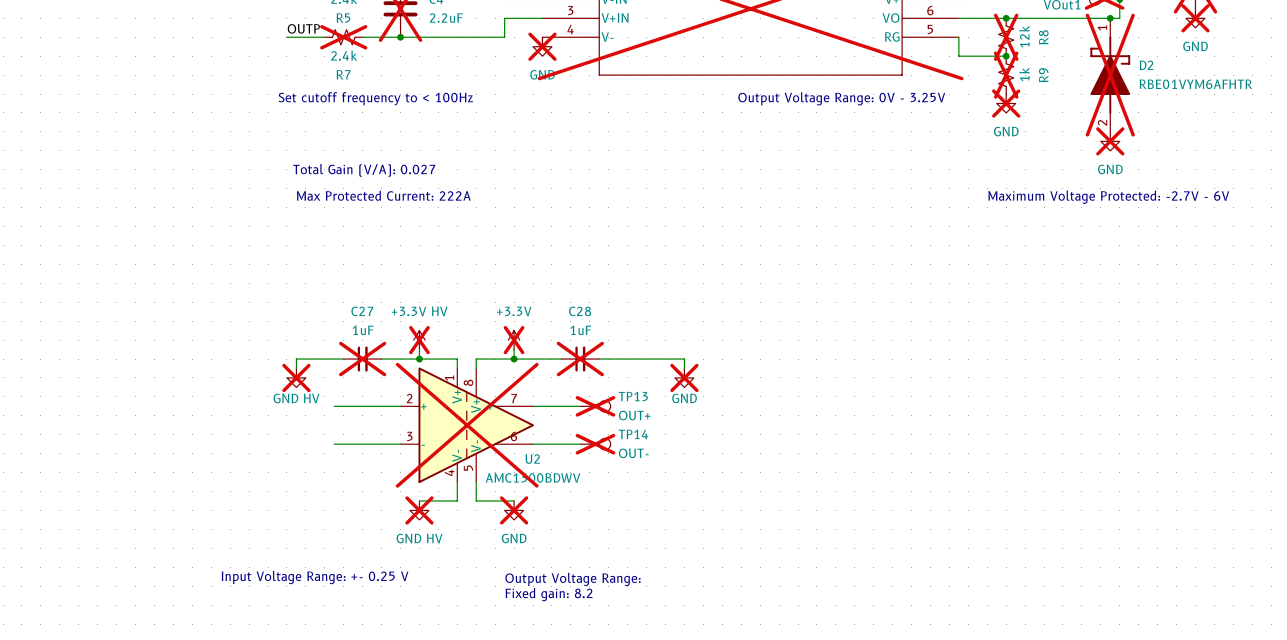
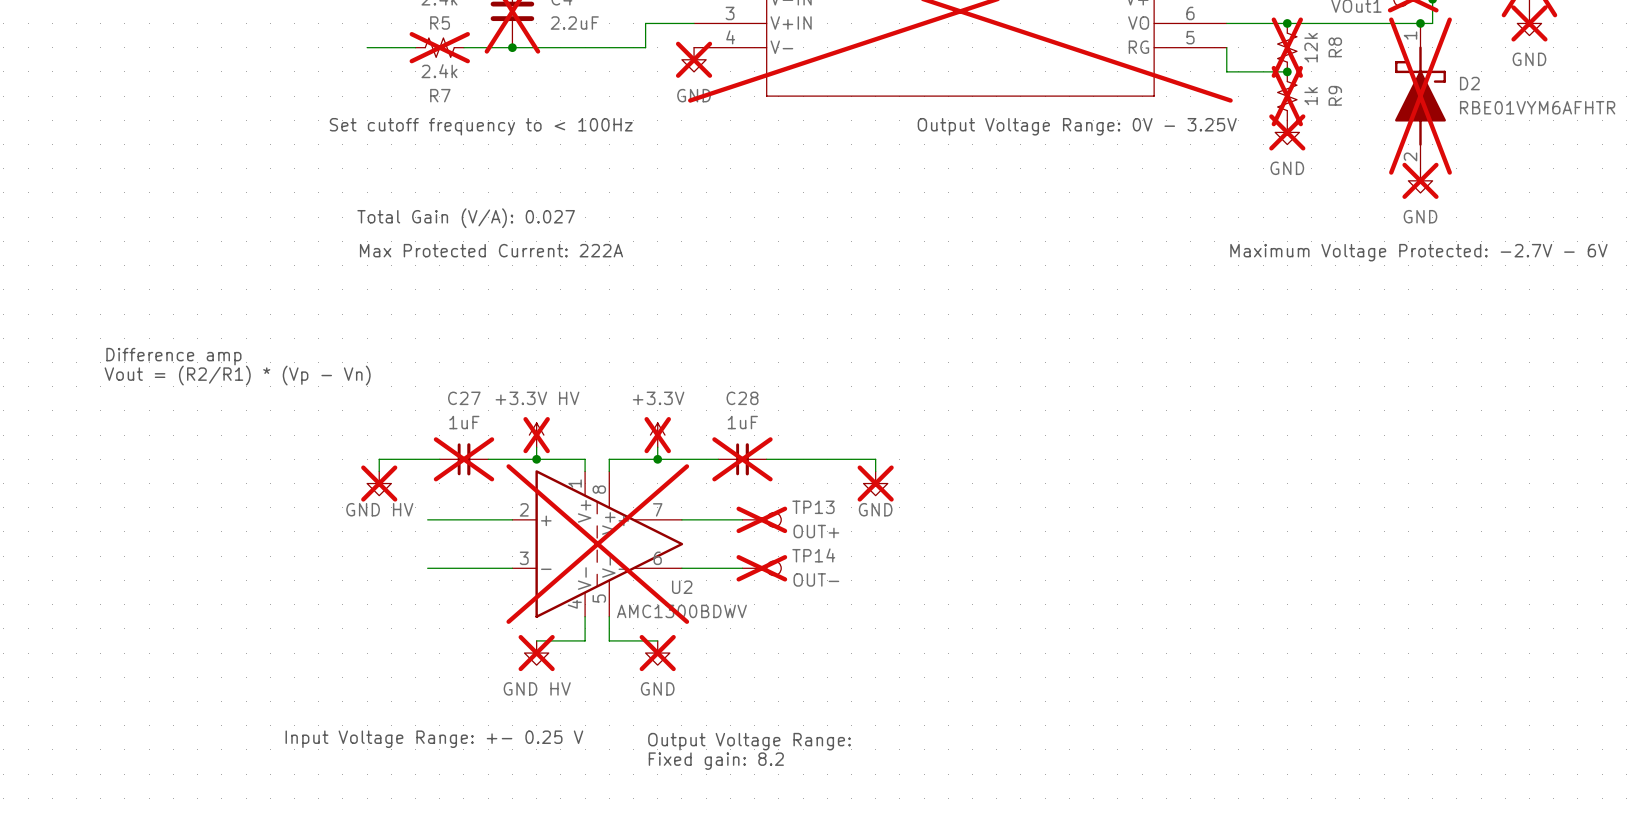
label: OUTP (303, 28) -> none
text: none -> Difference amp (173, 356)
text: none -> Vout = (R2/R1) * (Vp - Vn) (237, 375)

